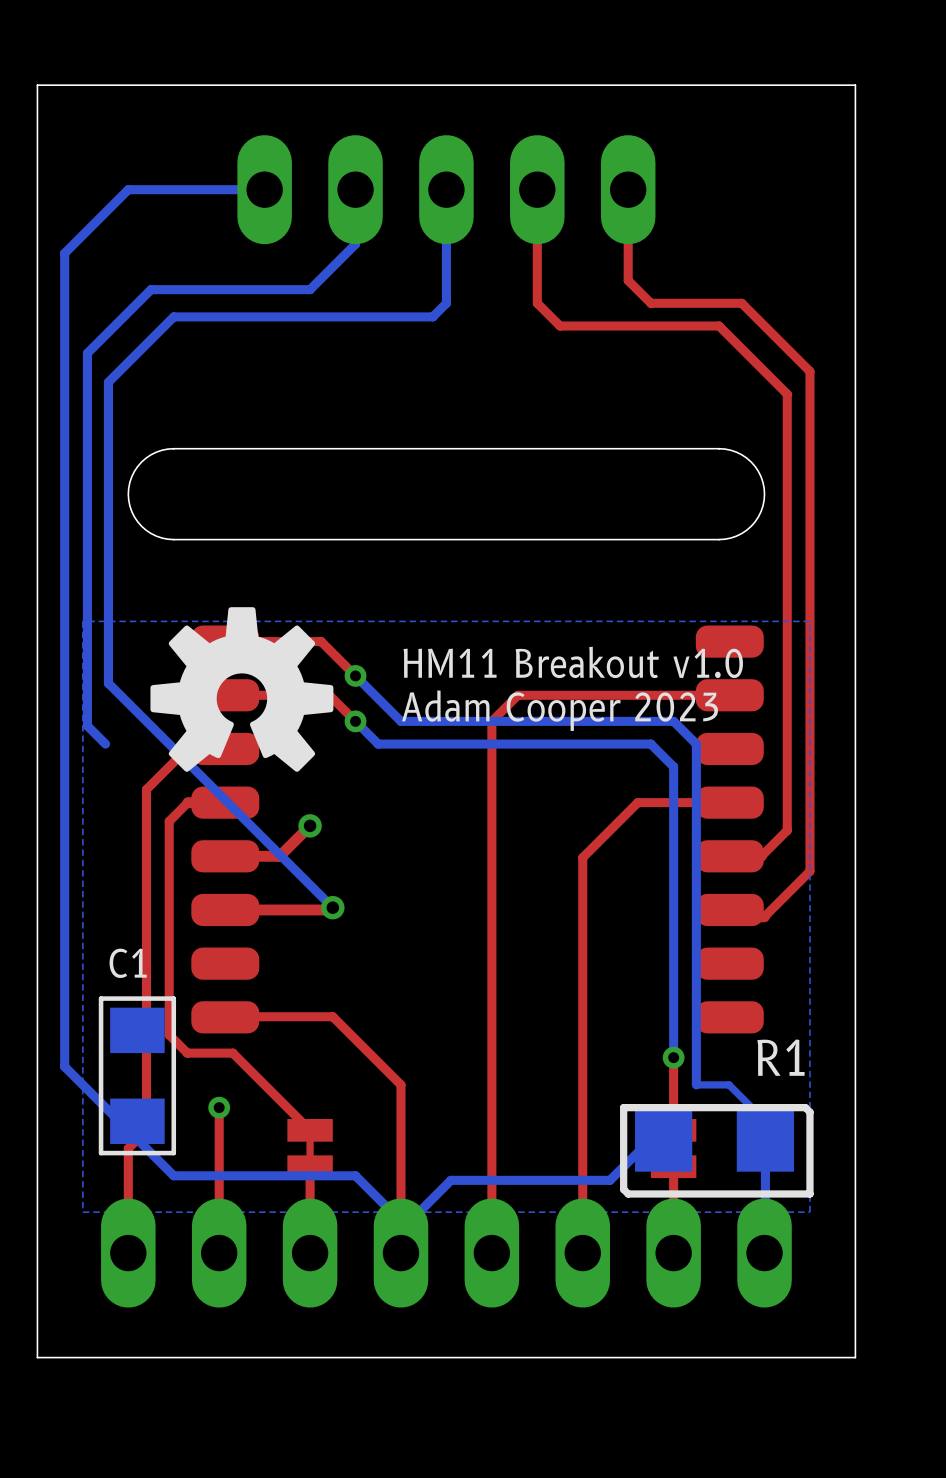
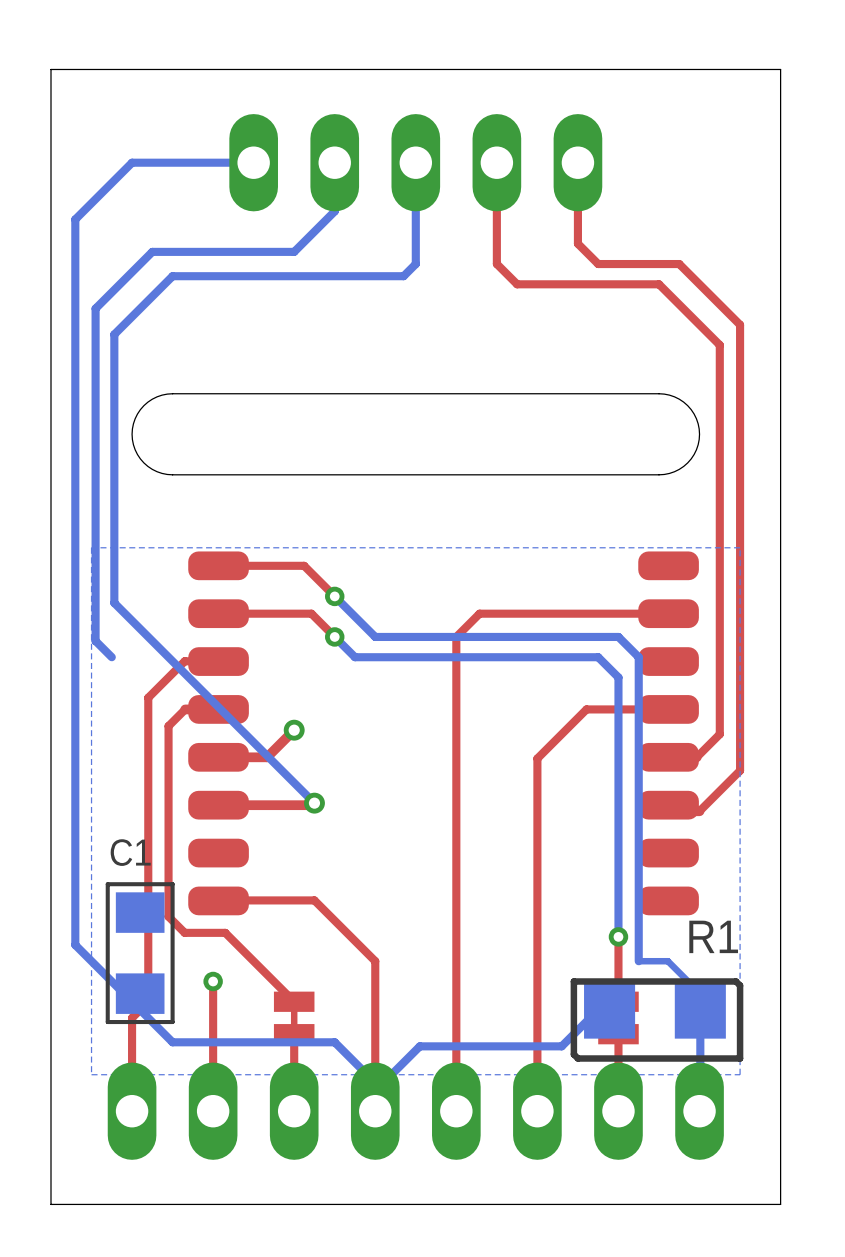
drawing: [150, 607, 334, 772] -> none
text: HM11 Breakout v1.0 (573, 662) -> none
text: Adam Cooper 2023 (560, 710) -> none

